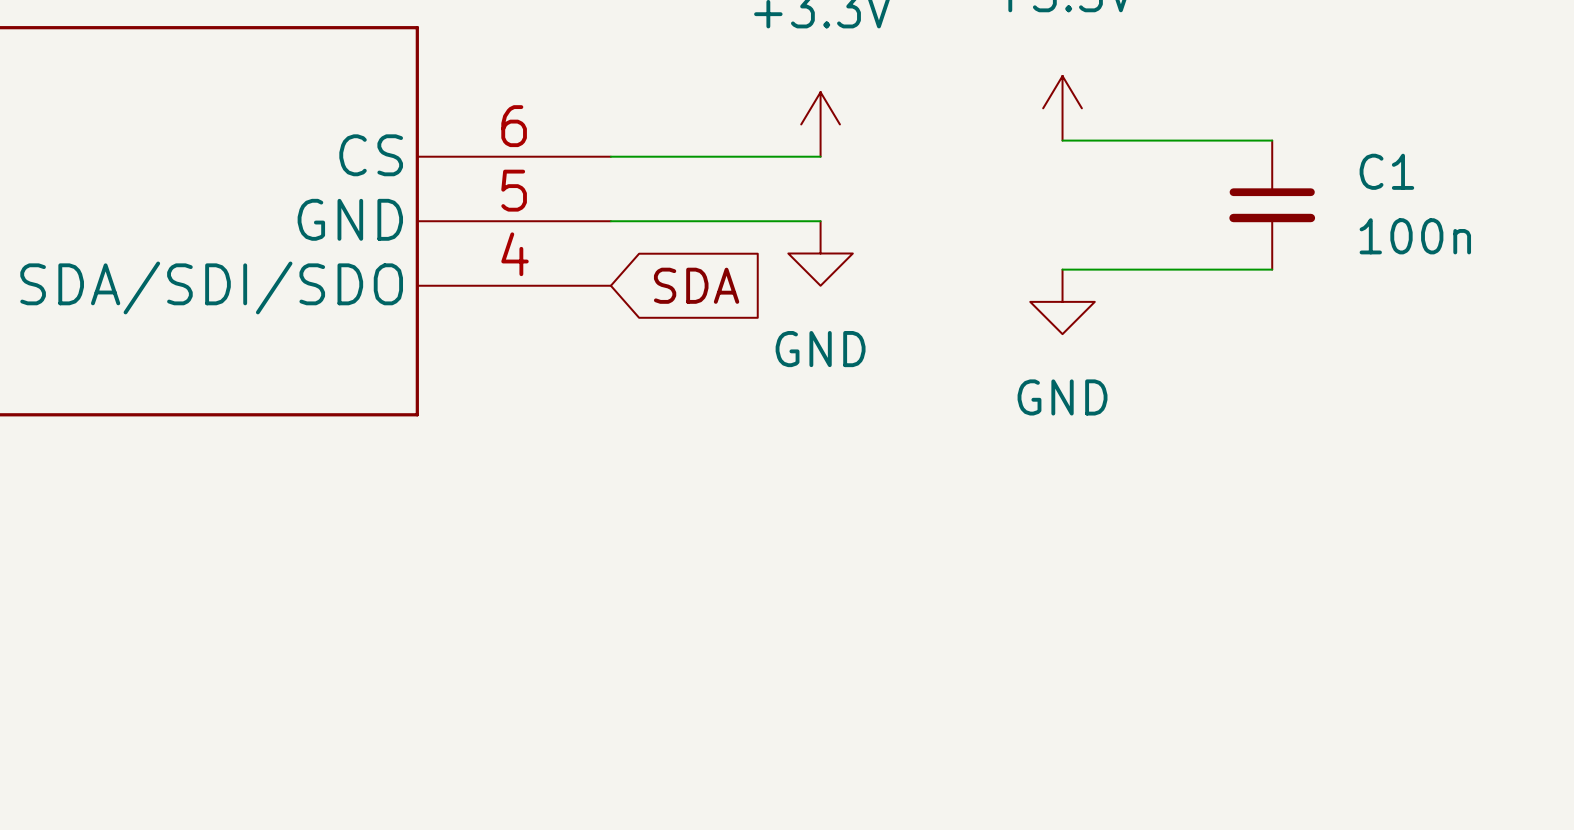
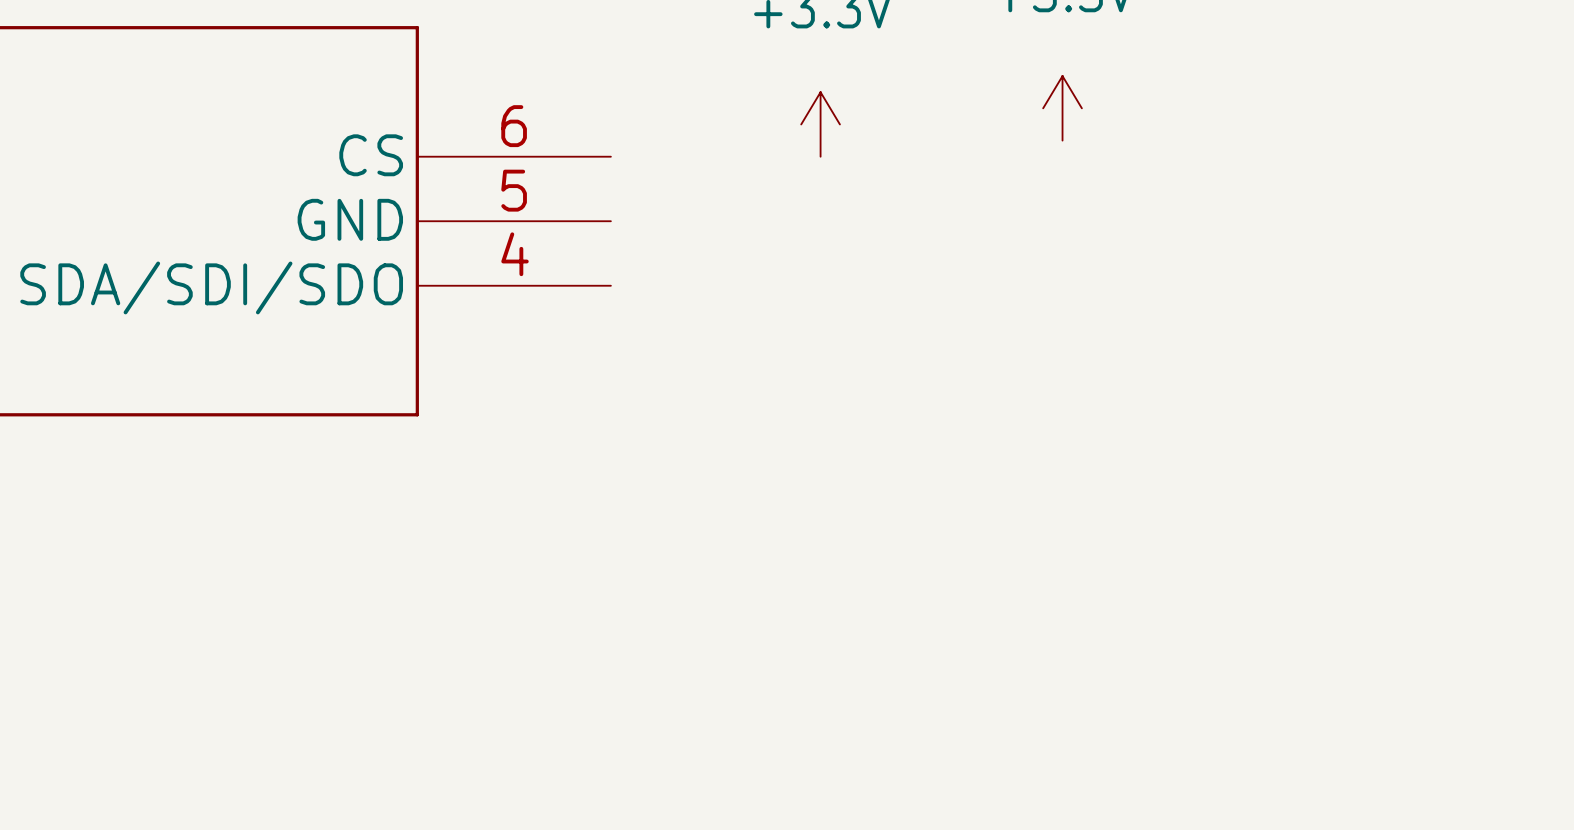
wire: (1062, 140) (1272, 140) -> none
wire: (610, 156) (820, 156) -> none
C1: 100n (1272, 205) -> none
wire: (610, 221) (820, 221) -> none
power symbol: GND (820, 253) -> none
wire: (1062, 269) (1272, 269) -> none
global label: SDA (696, 285) -> none
power symbol: GND (1062, 301) -> none

